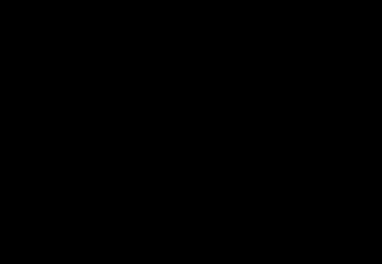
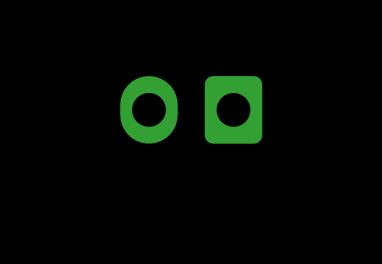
part: none -> (191, 109)

